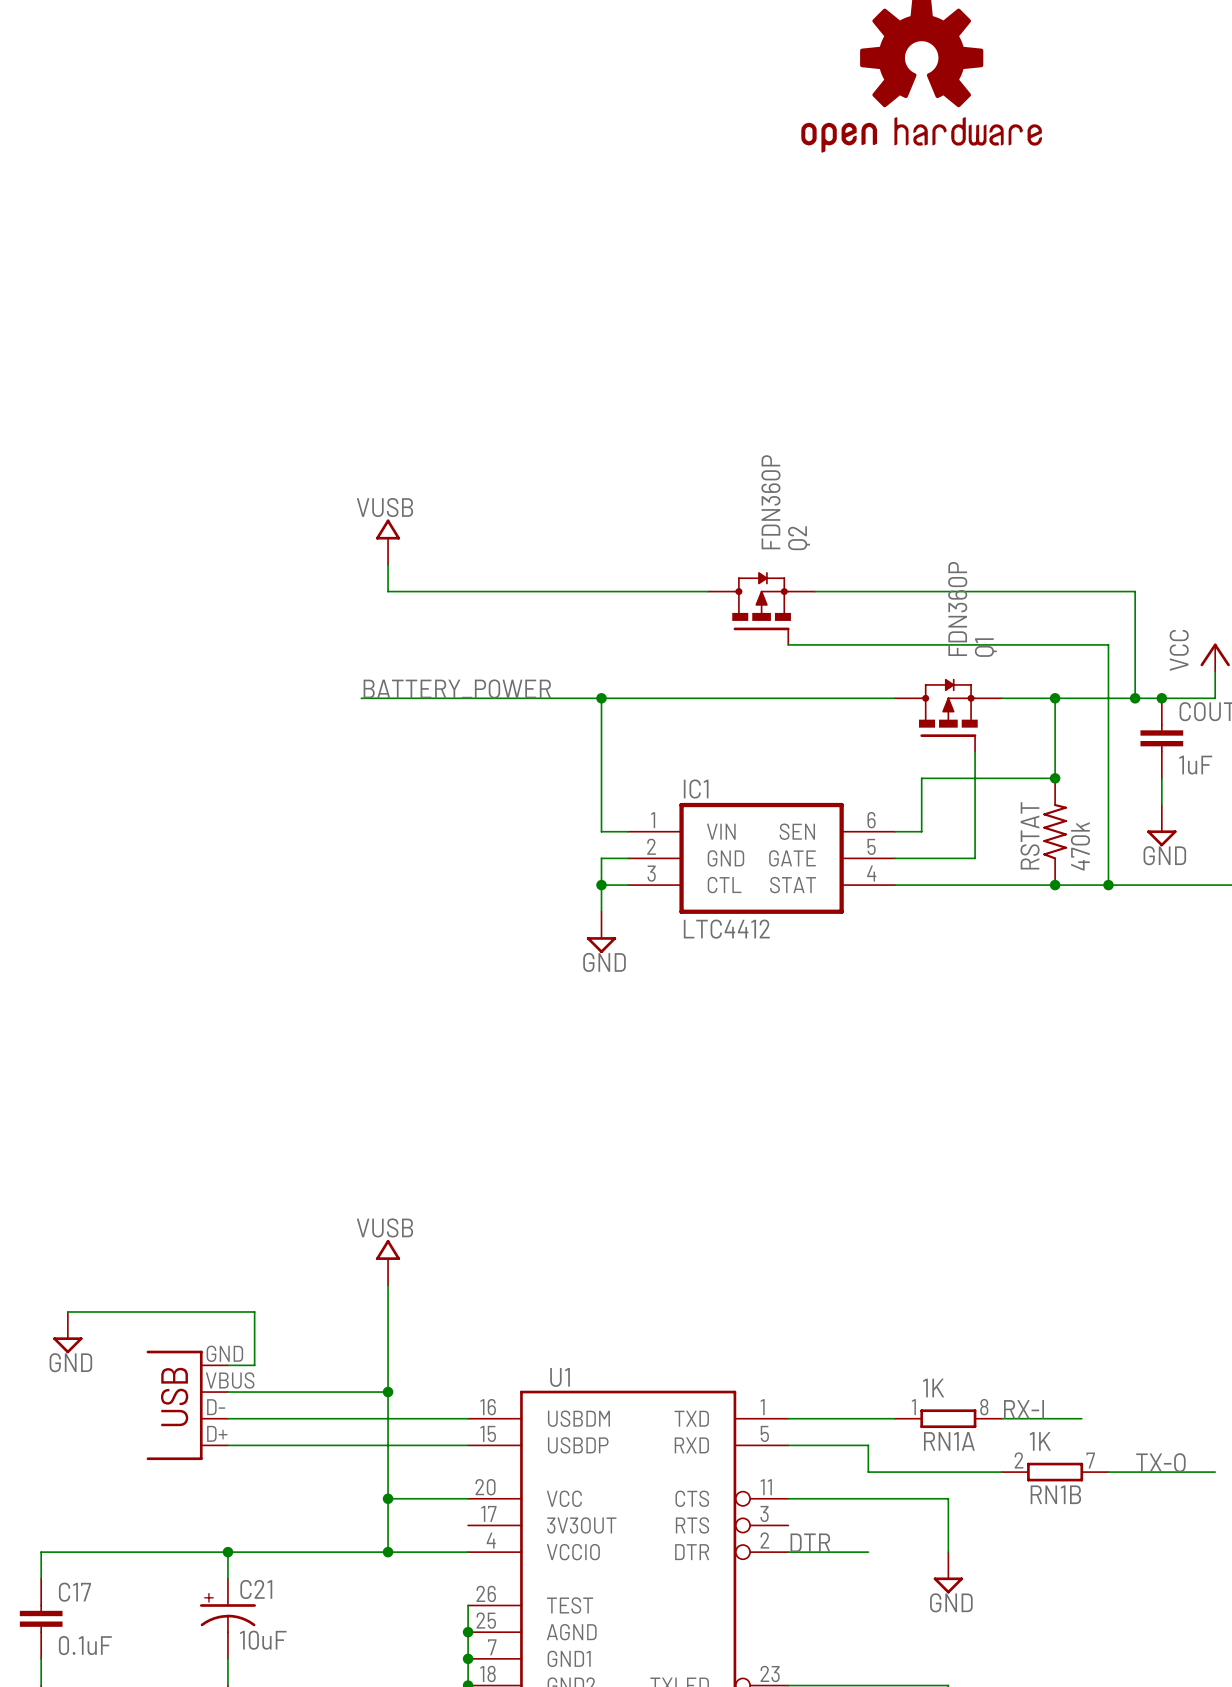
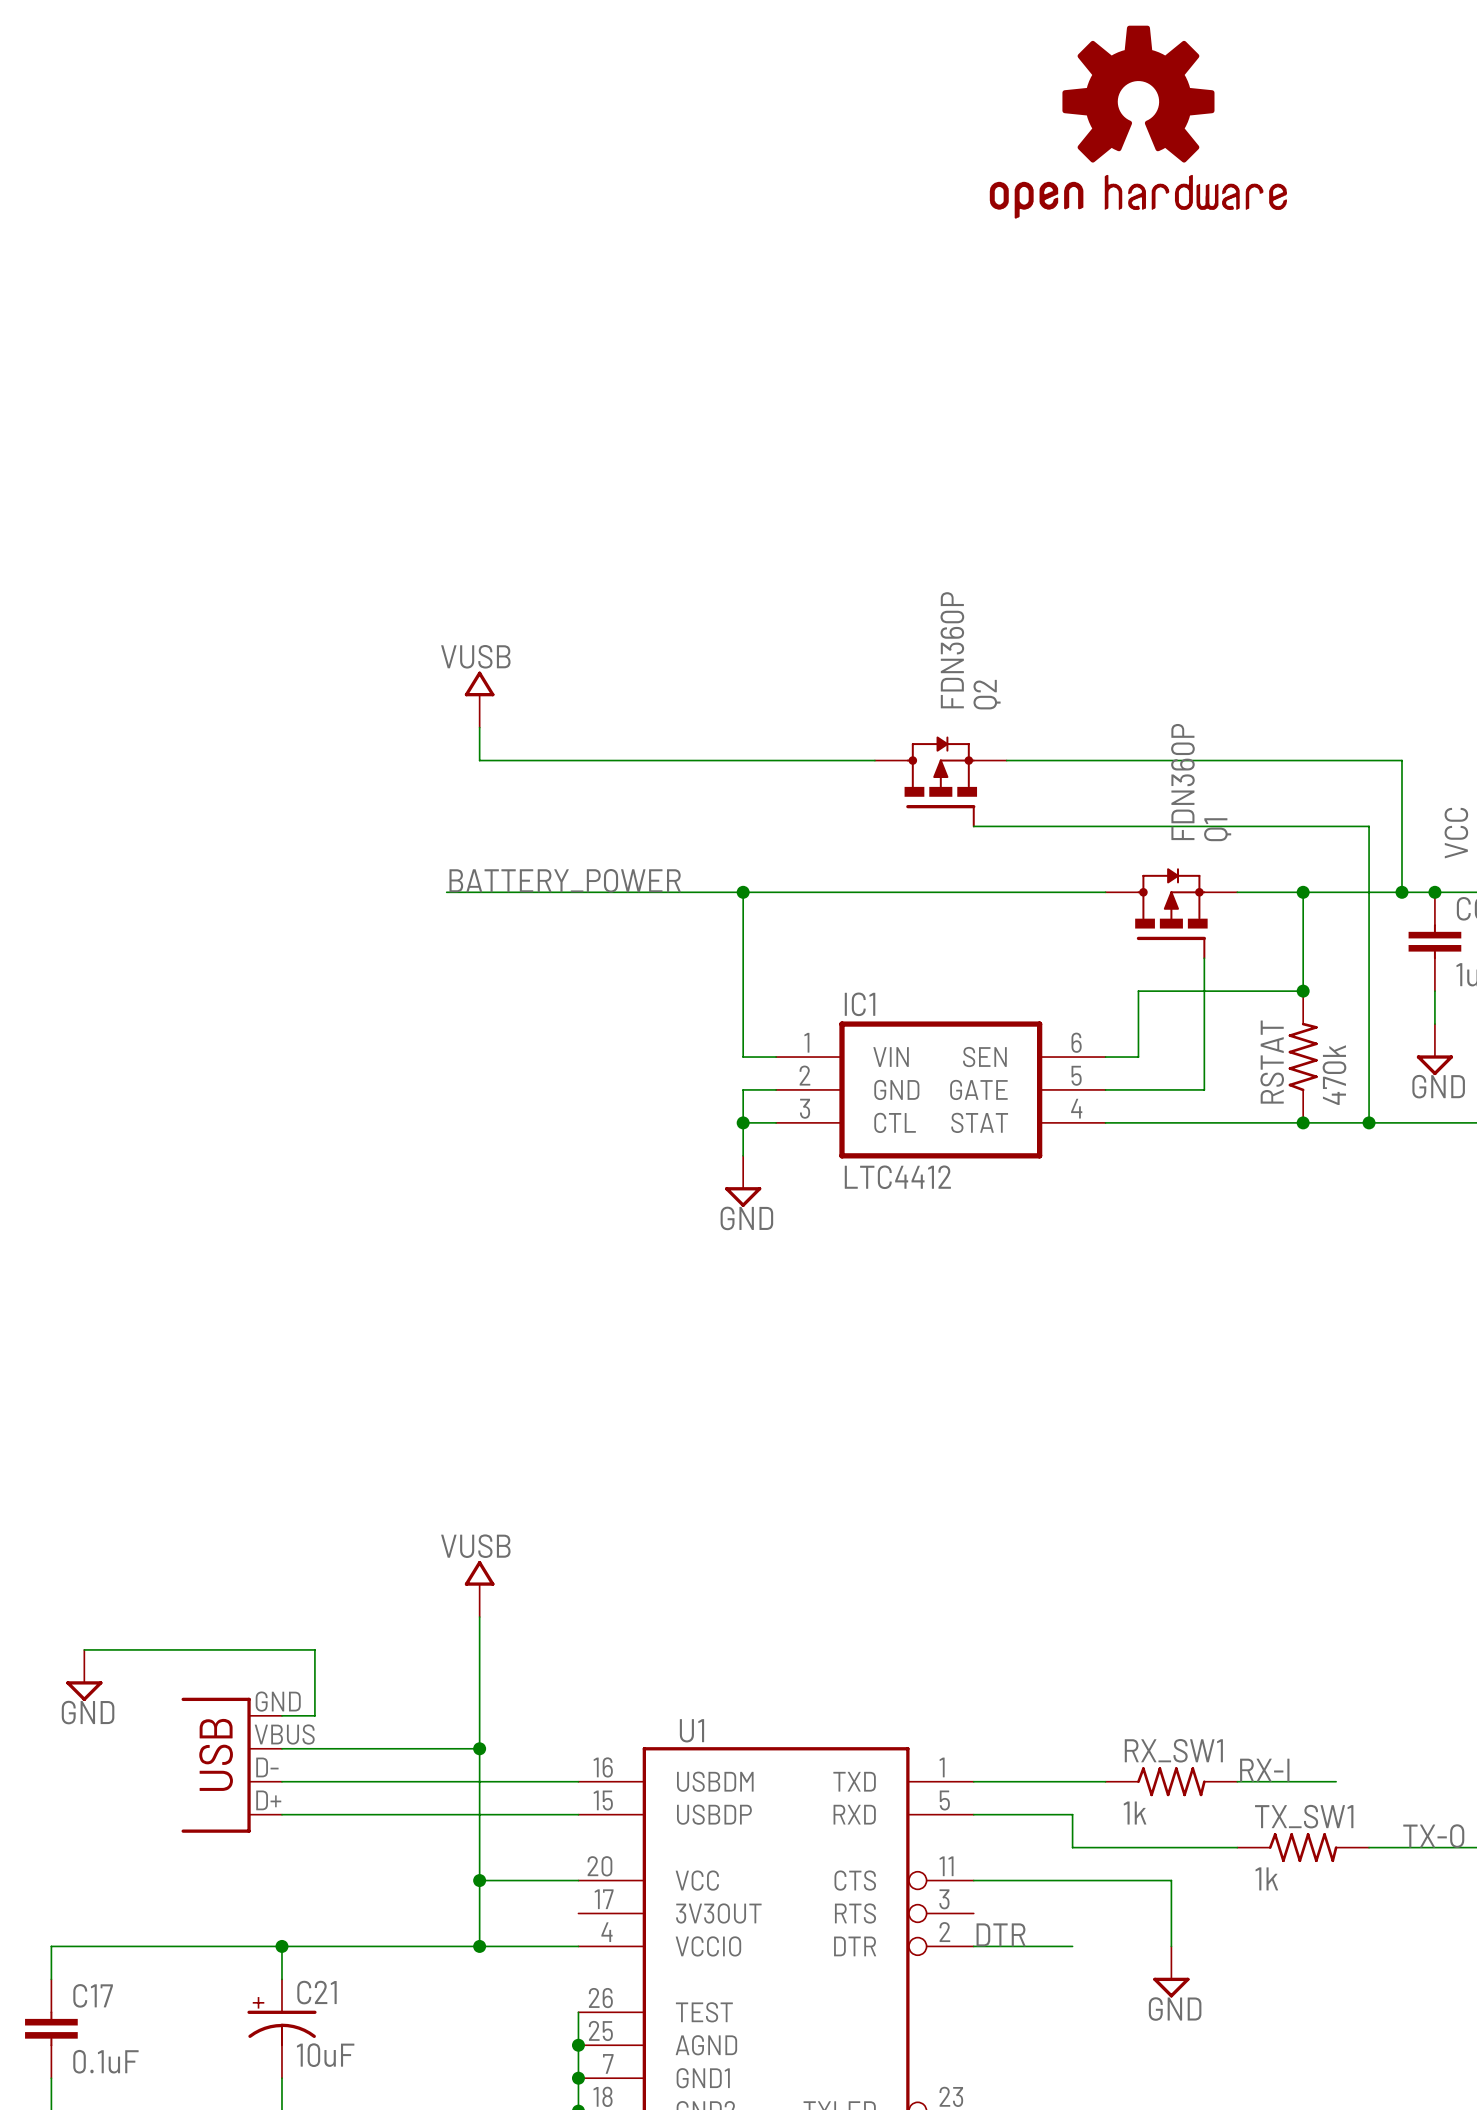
RN1A: 1K (948, 1418) -> none
RX_SW1: none -> 1k (1171, 1781)
RN1B: 1K (1055, 1472) -> none
TX_SW1: none -> 1k (1303, 1847)

